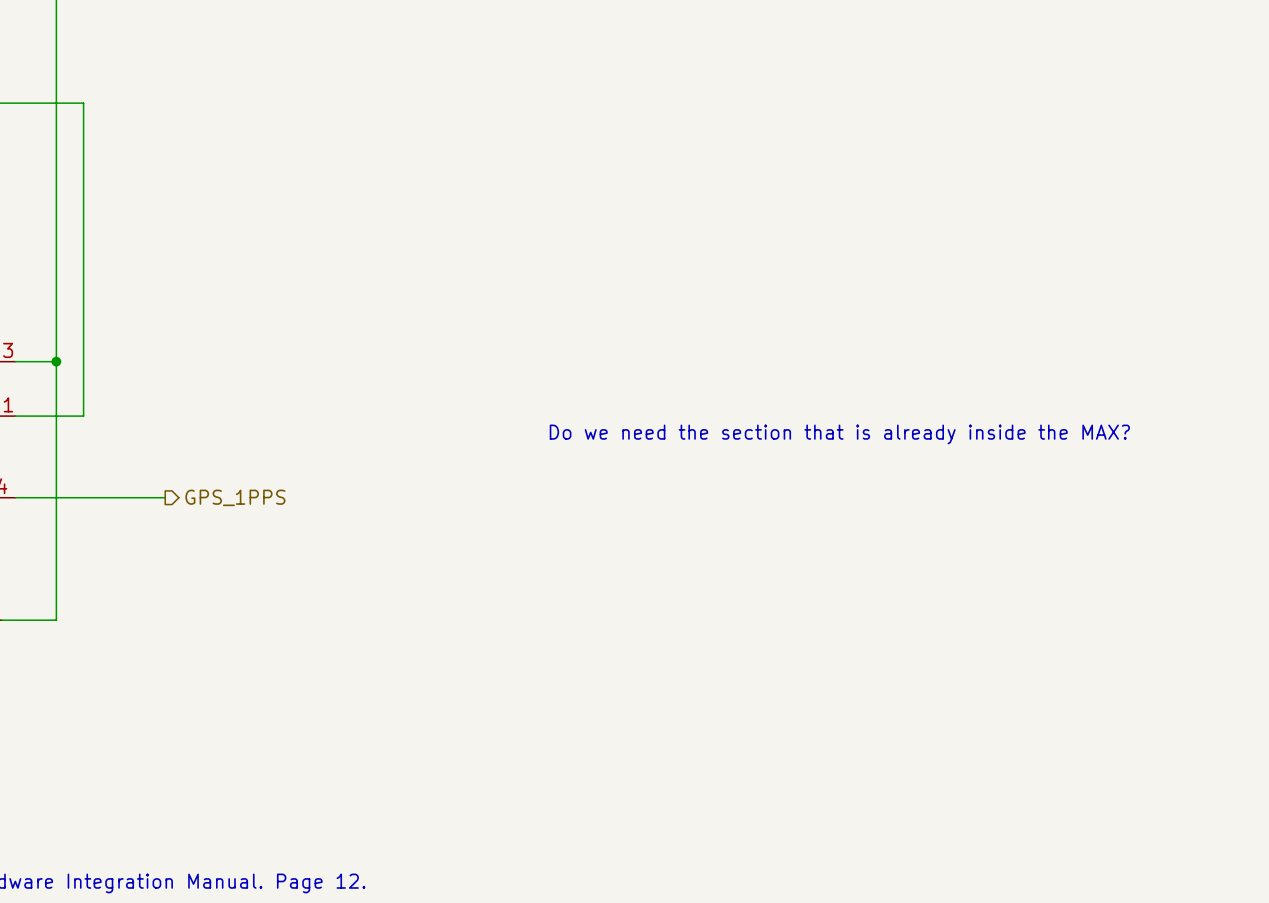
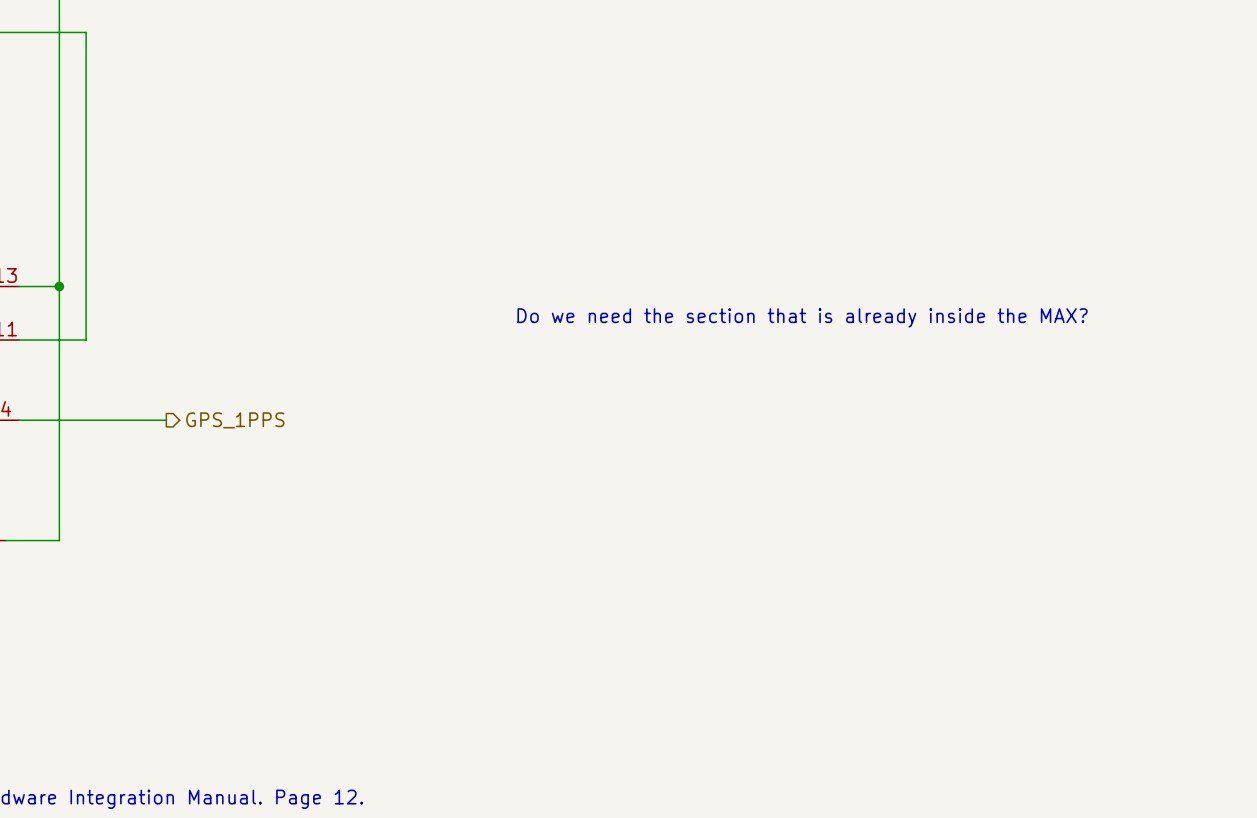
text position: Do we need the section that is already inside the MAX? (839, 434) -> Do we need the section that is already inside the MAX? (802, 317)

